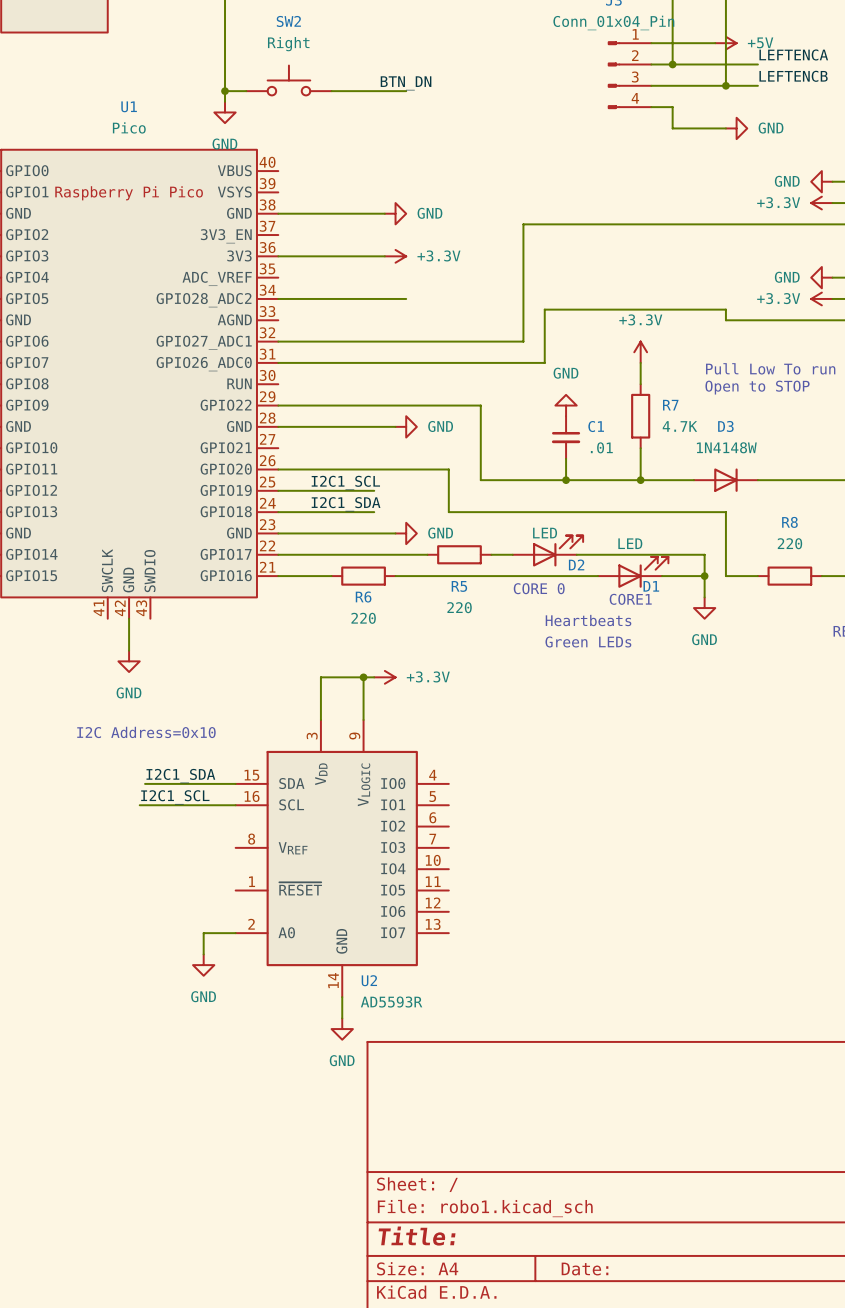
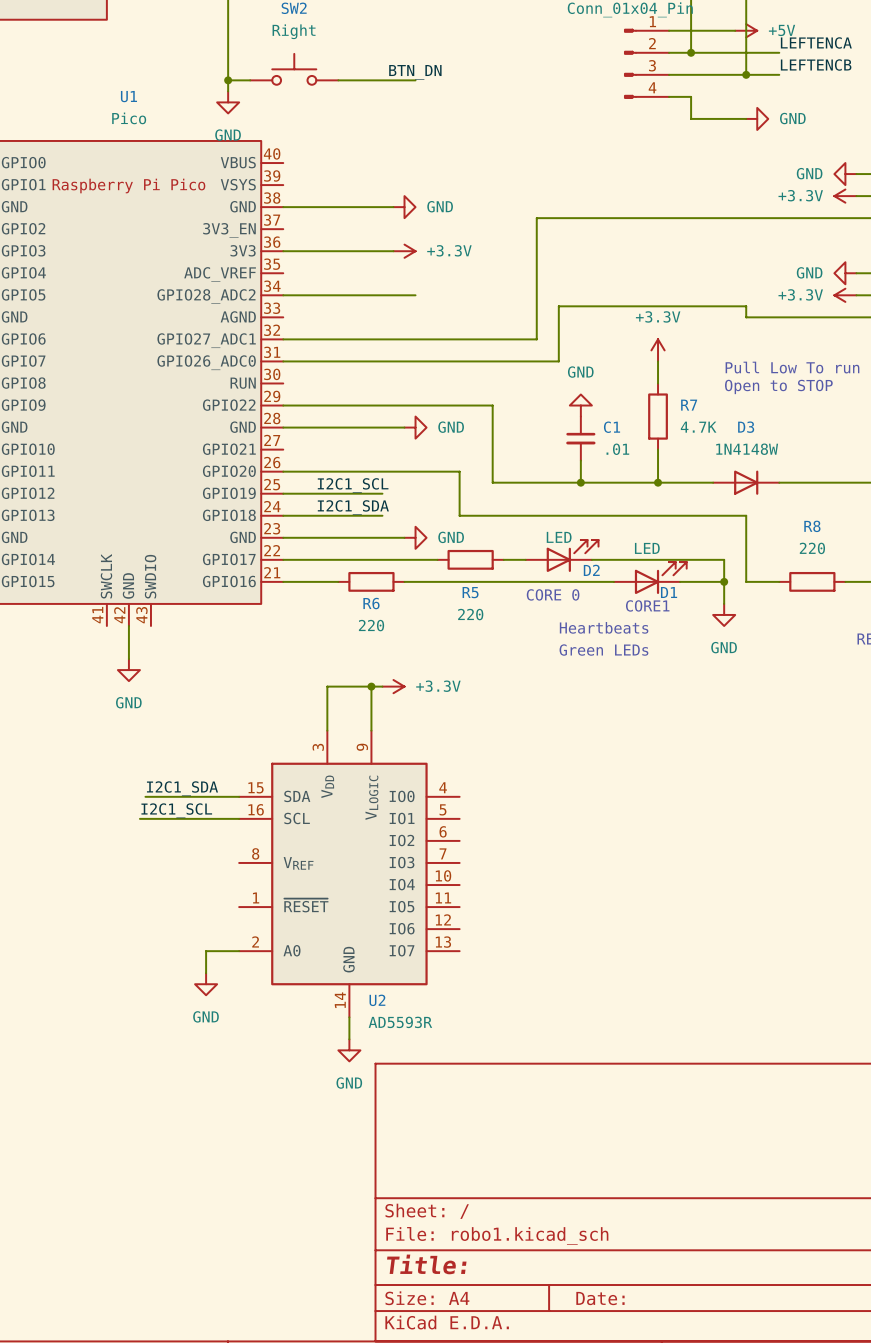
text: I2C Address=0x10 (146, 732) -> none

